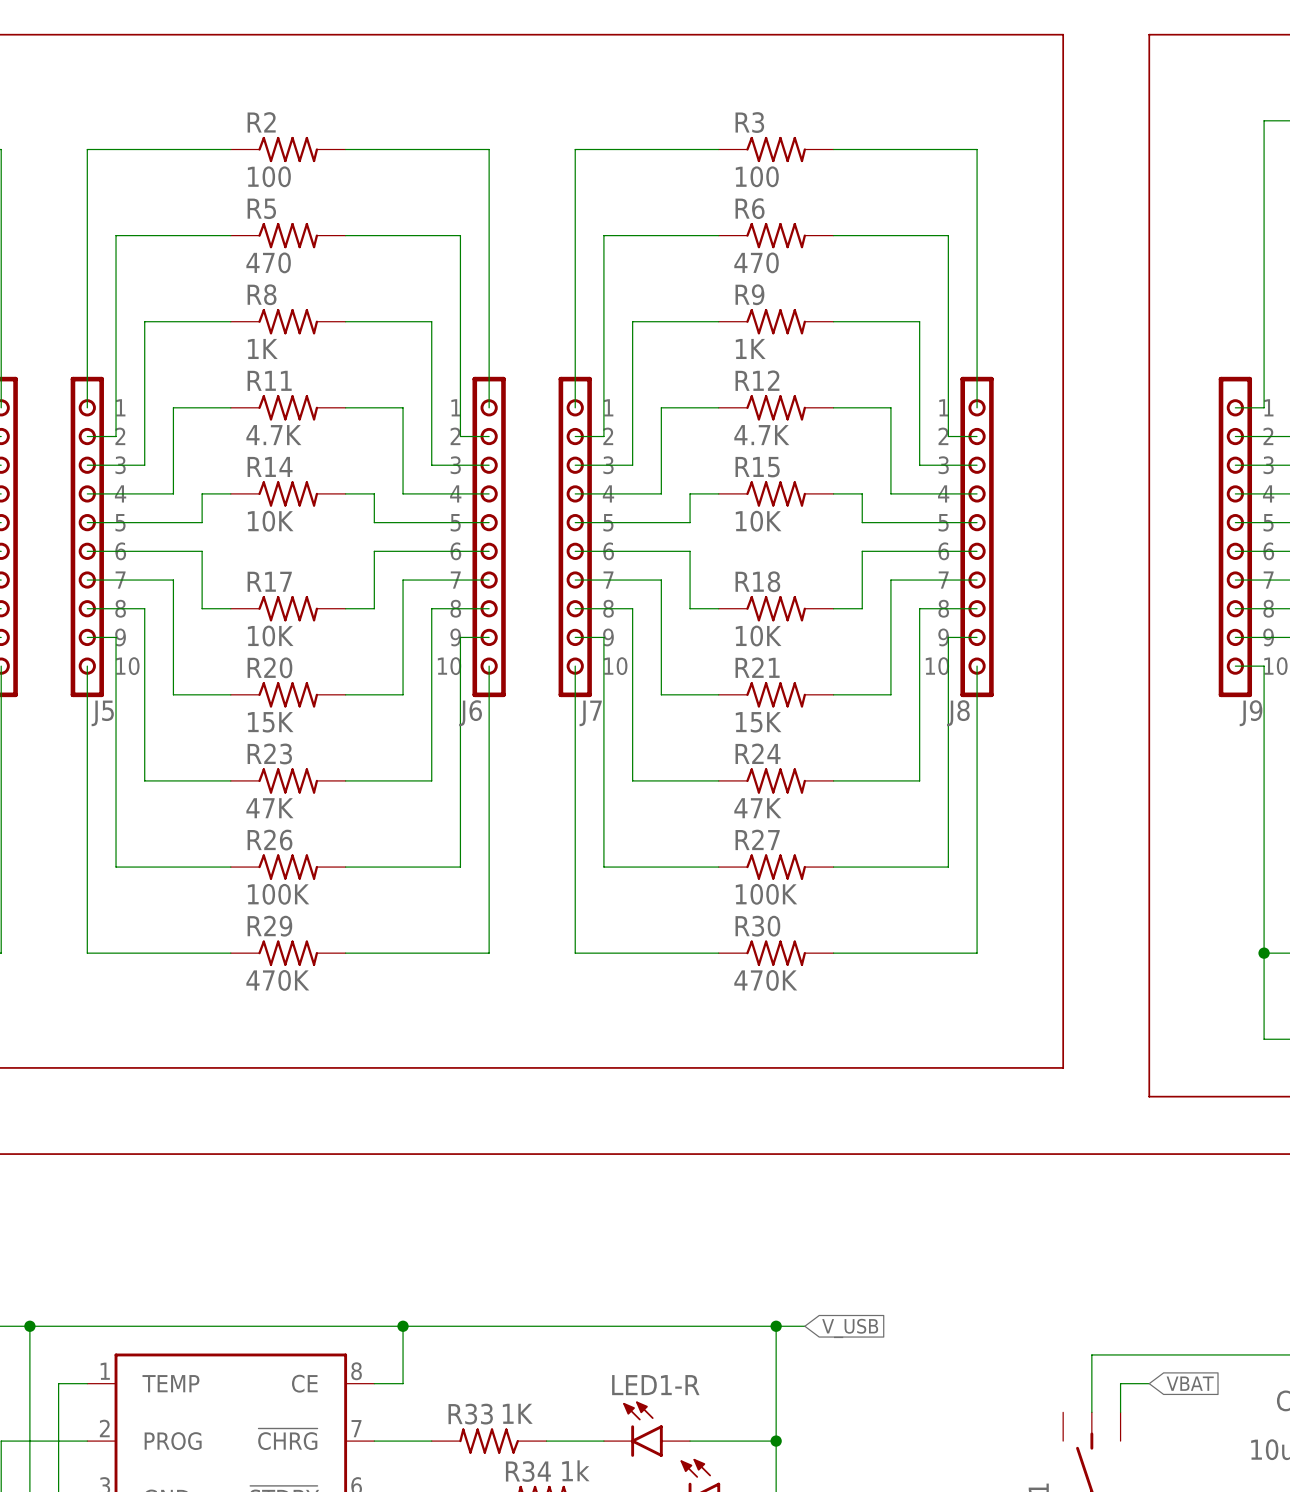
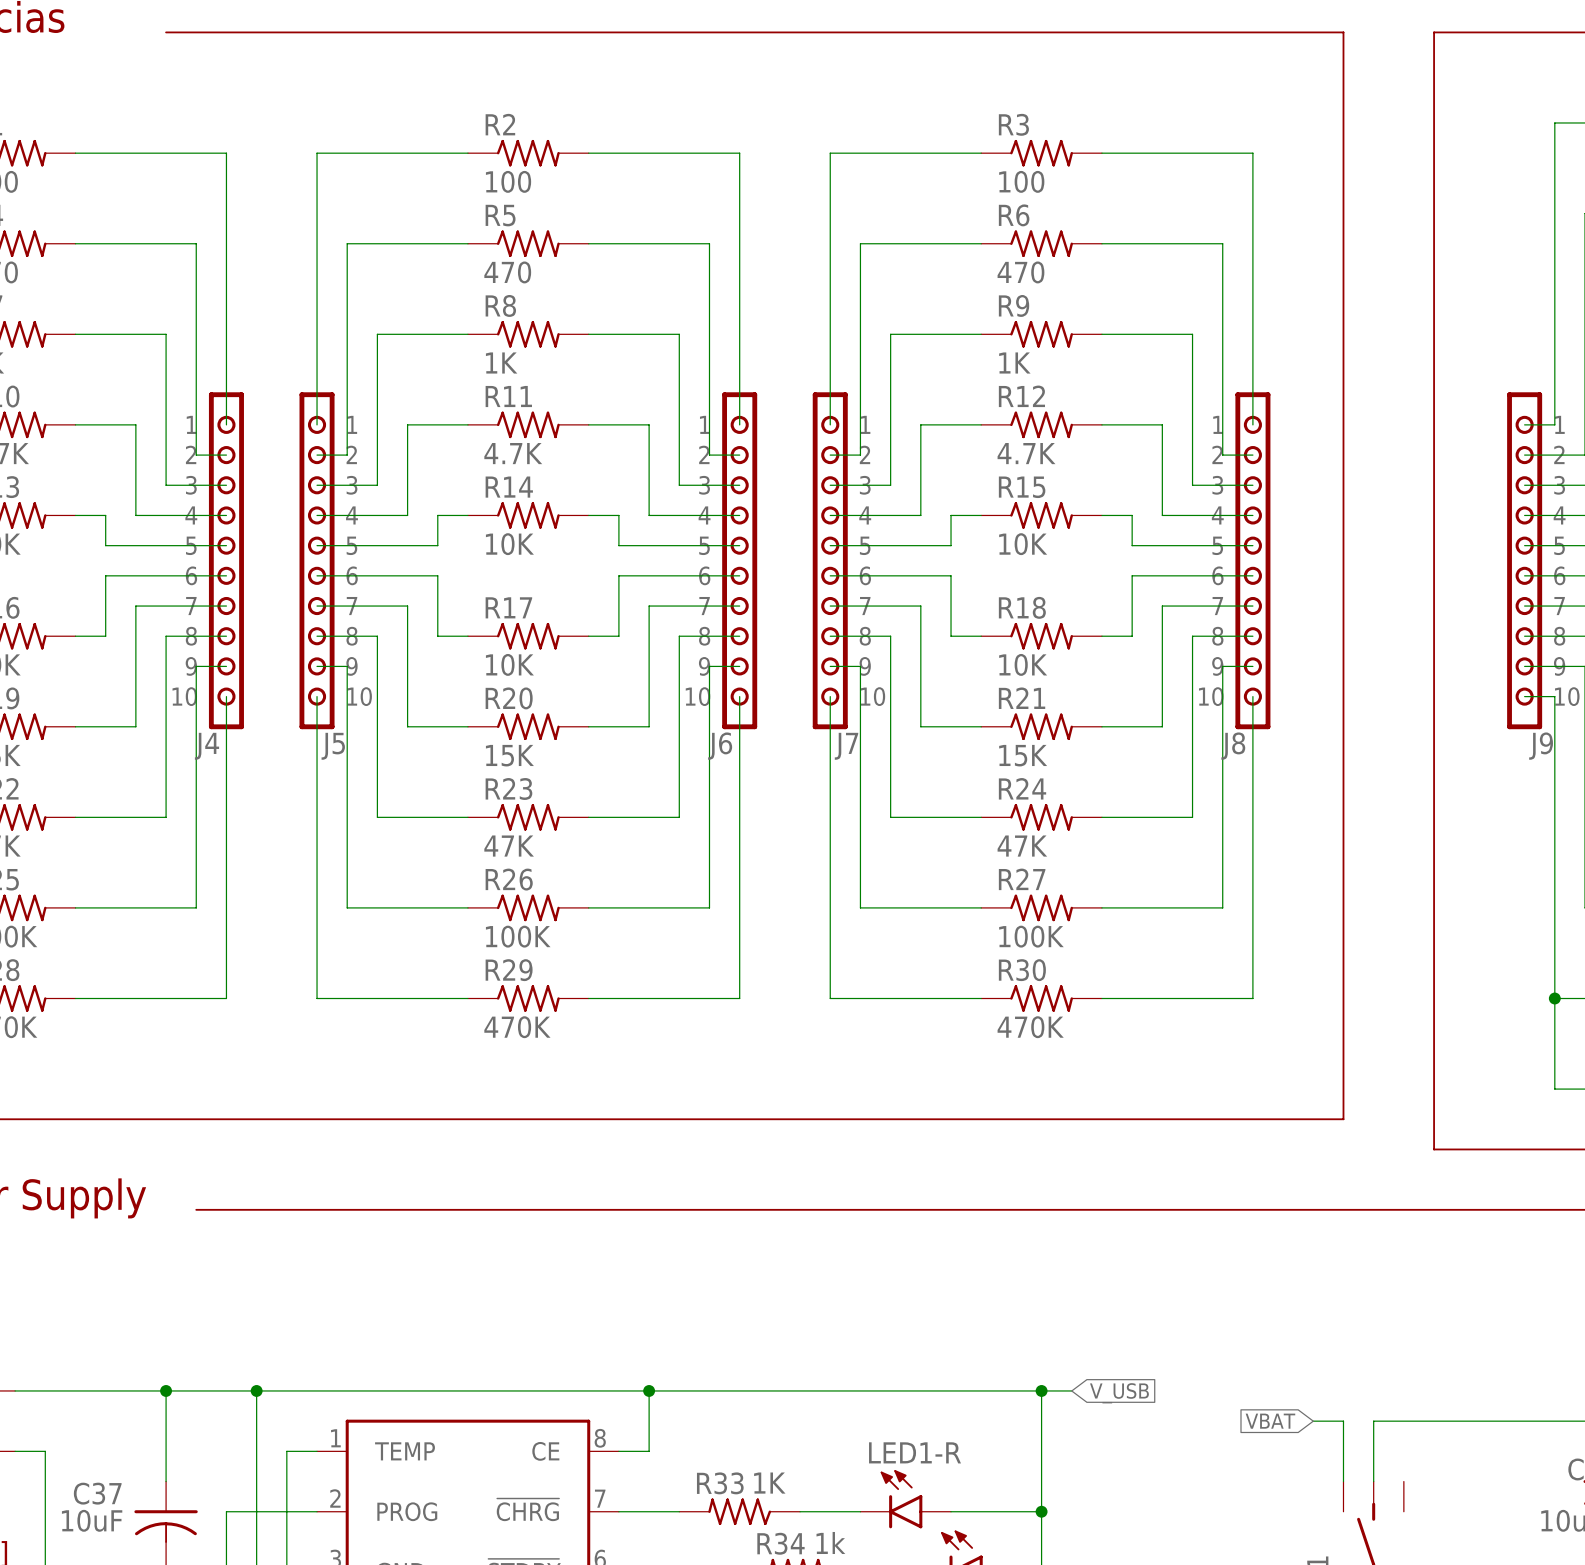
wire: none -> (1313, 1421) (1343, 1421) (1343, 1481)
wire: (1149, 1383) (1120, 1383) (1120, 1412) -> none
global label rotation: 0° (1190, 1383) -> 180° (1270, 1421)
global label position: VBAT (1190, 1383) -> VBAT (1270, 1421)

